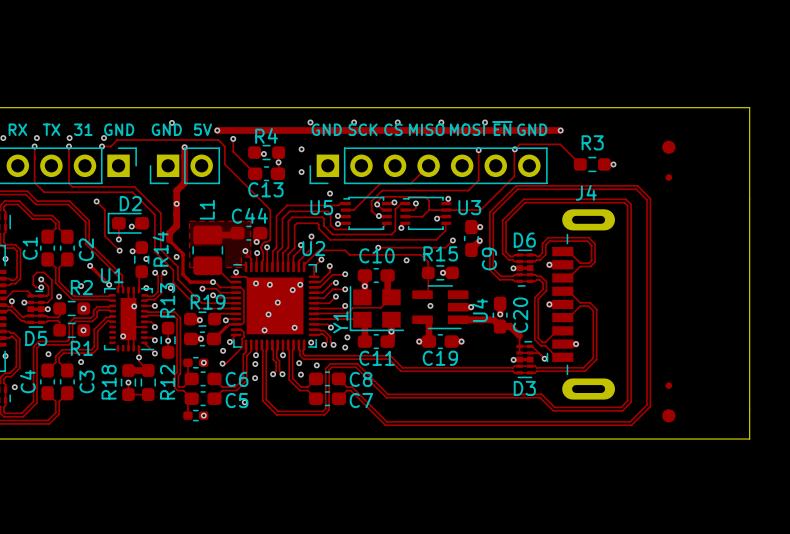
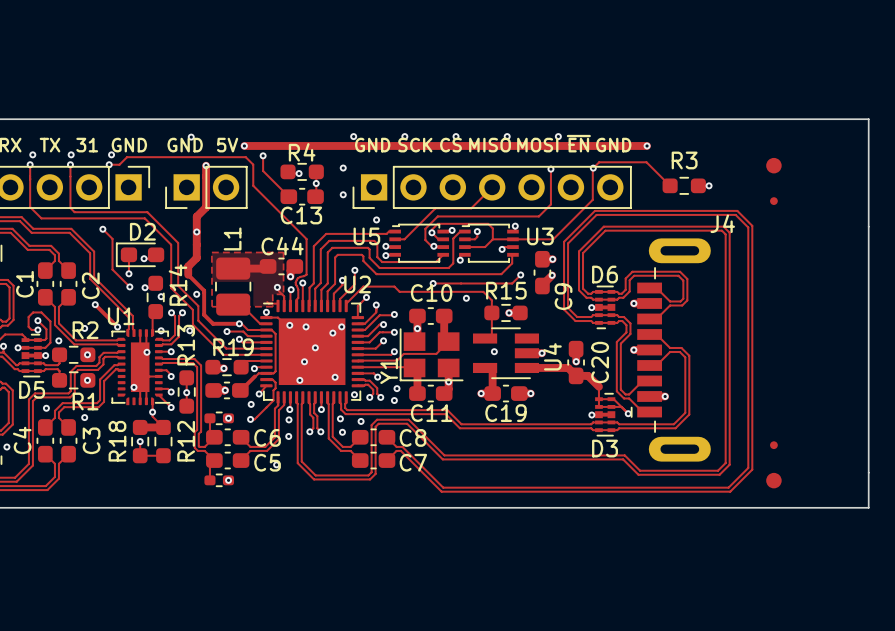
J4 name position: J4 (586, 192) -> J4 (722, 223)

